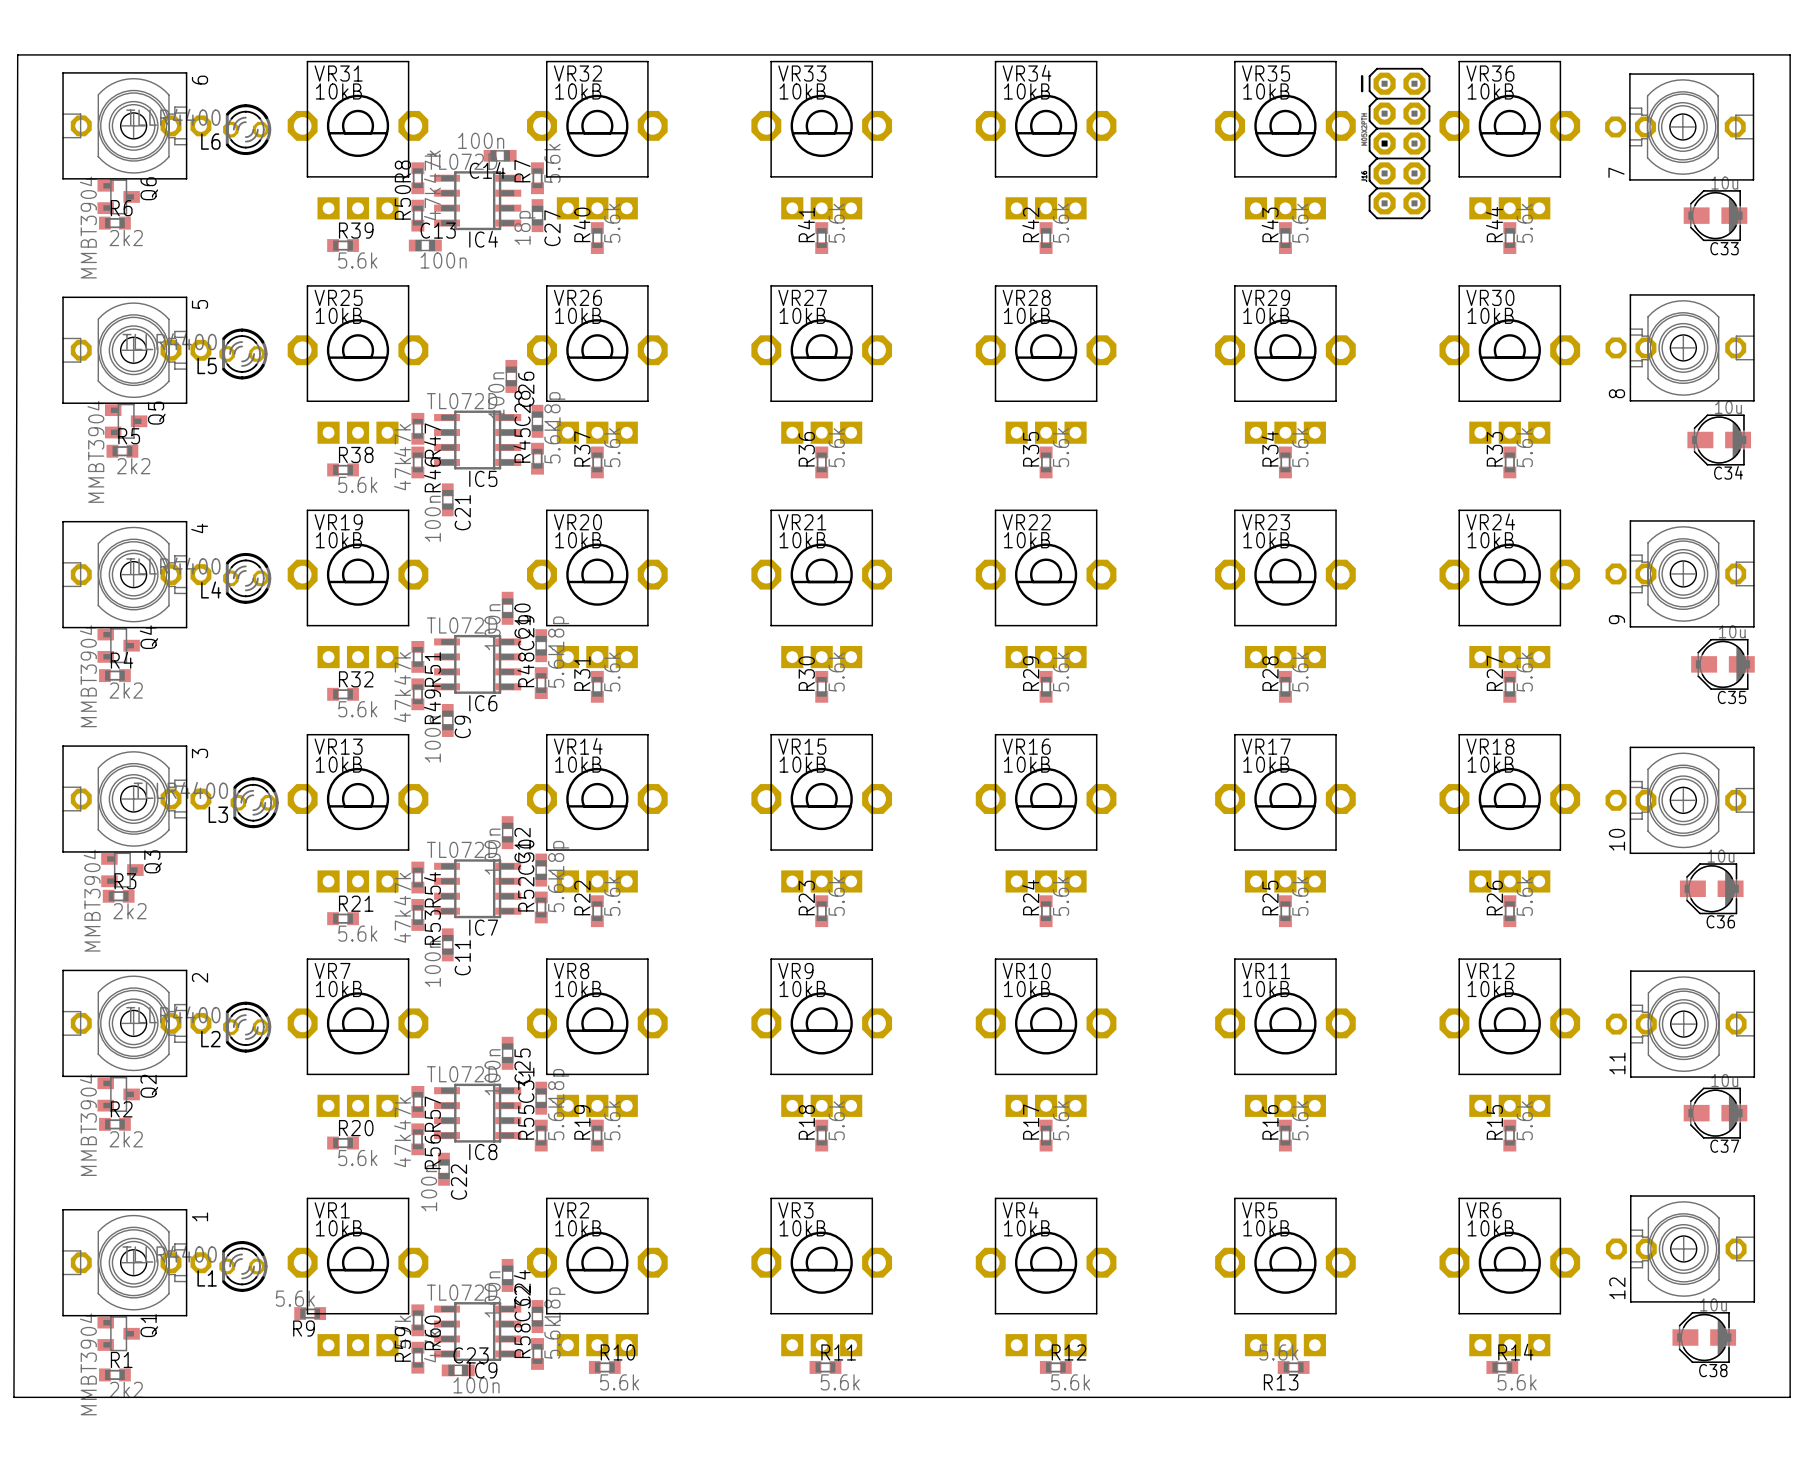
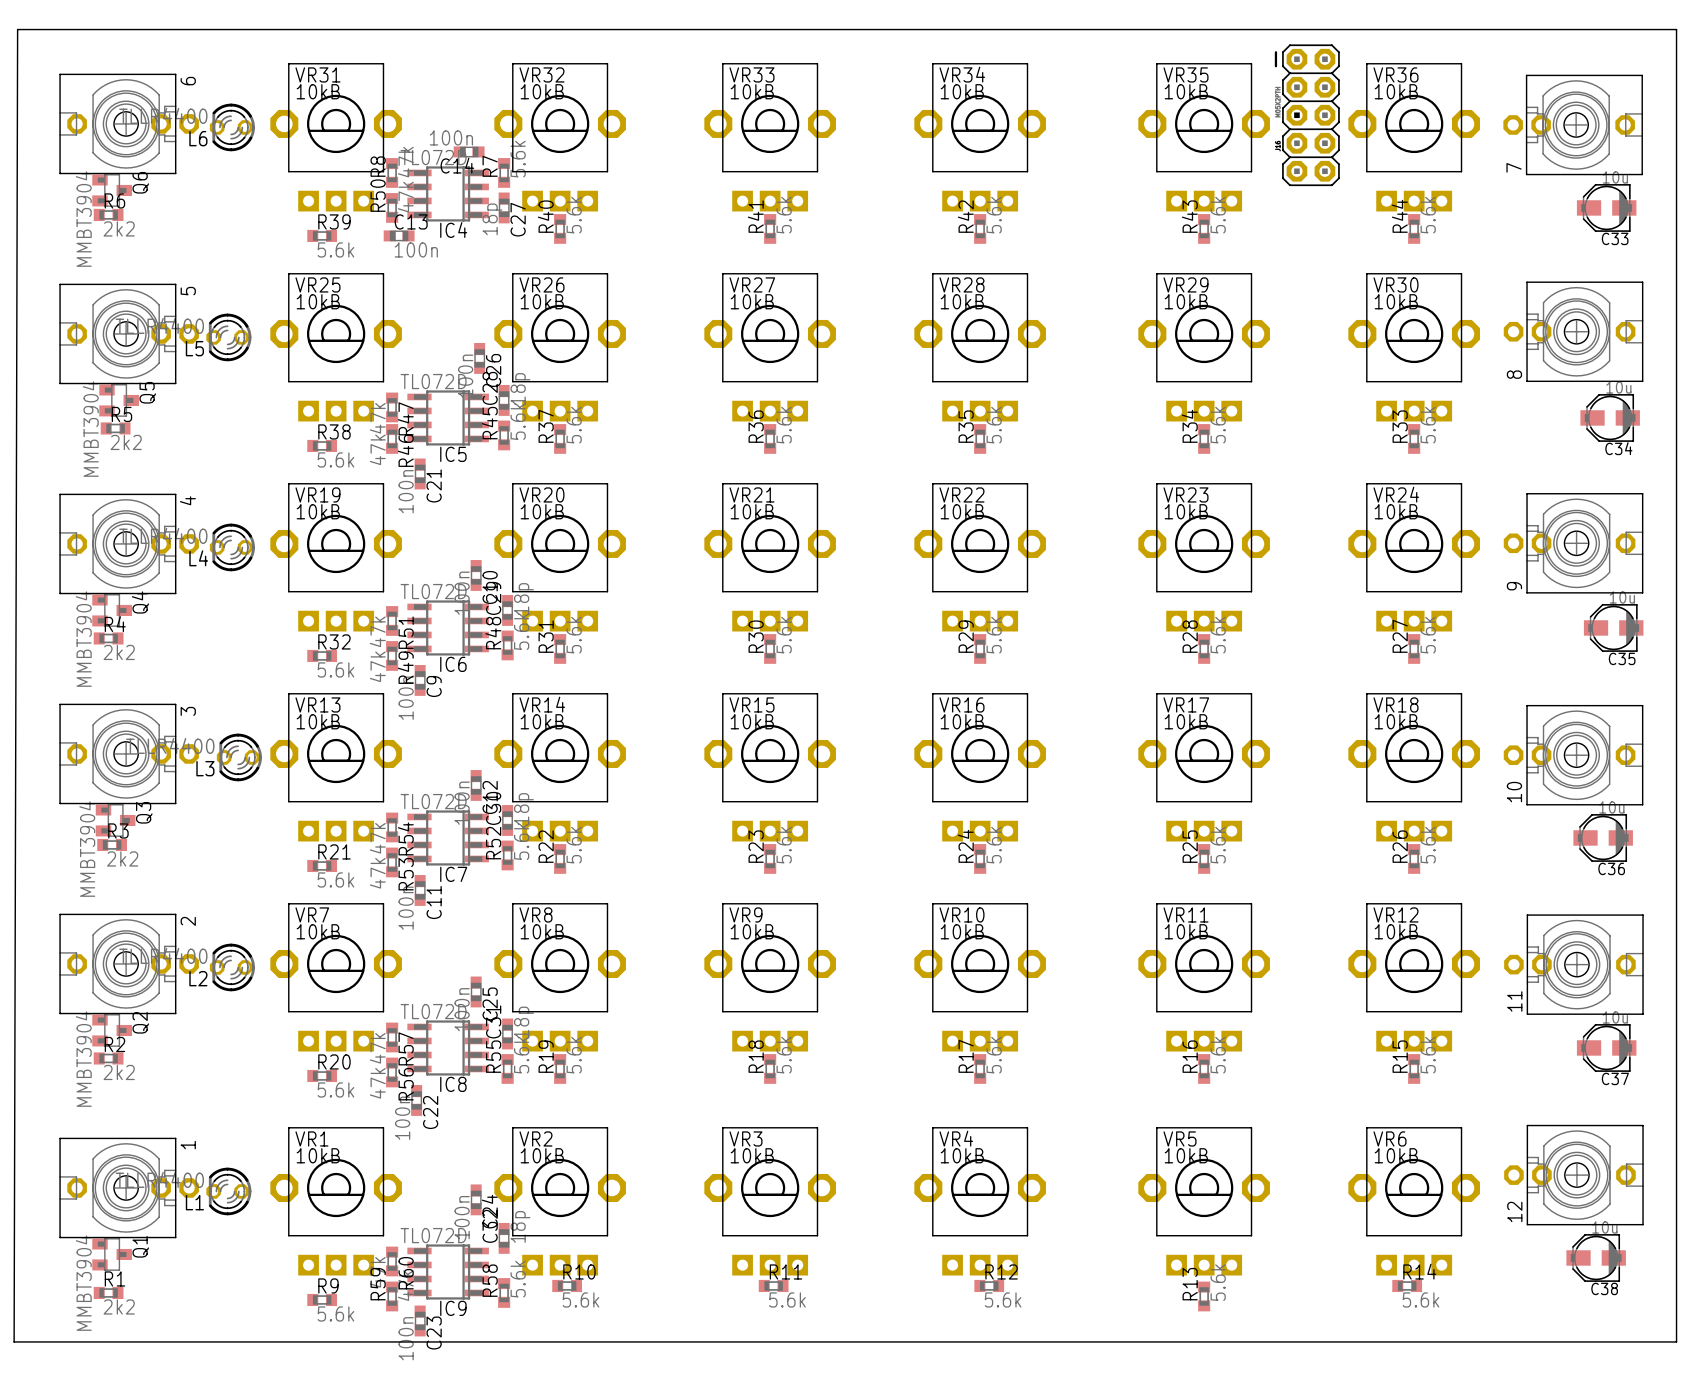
board edge: (1790, 54) (17, 54) (13, 1397) (1790, 1397) -> (1676, 57) (1676, 29) (17, 29) (14, 1341) (1676, 1341) (1676, 1313)
part position: (1395, 143) -> (1307, 115)
R9 value position: 5.6k (295, 1298) -> 5.6k (335, 1313)
R9 position: (310, 1313) -> (322, 1299)
R60 position: (417, 1320) -> (392, 1261)
R9 name position: R9 (304, 1328) -> R9 (328, 1285)
IC9 position: (477, 1331) -> (448, 1271)
R58 position: (537, 1353) -> (504, 1292)
R59 position: (417, 1357) -> (392, 1296)
R13 rotation: 0° (1293, 1367) -> 90° clockwise (1204, 1296)
C23 rotation: 0° (458, 1370) -> 90° clockwise (420, 1320)
C23 position: (458, 1370) -> (420, 1320)

